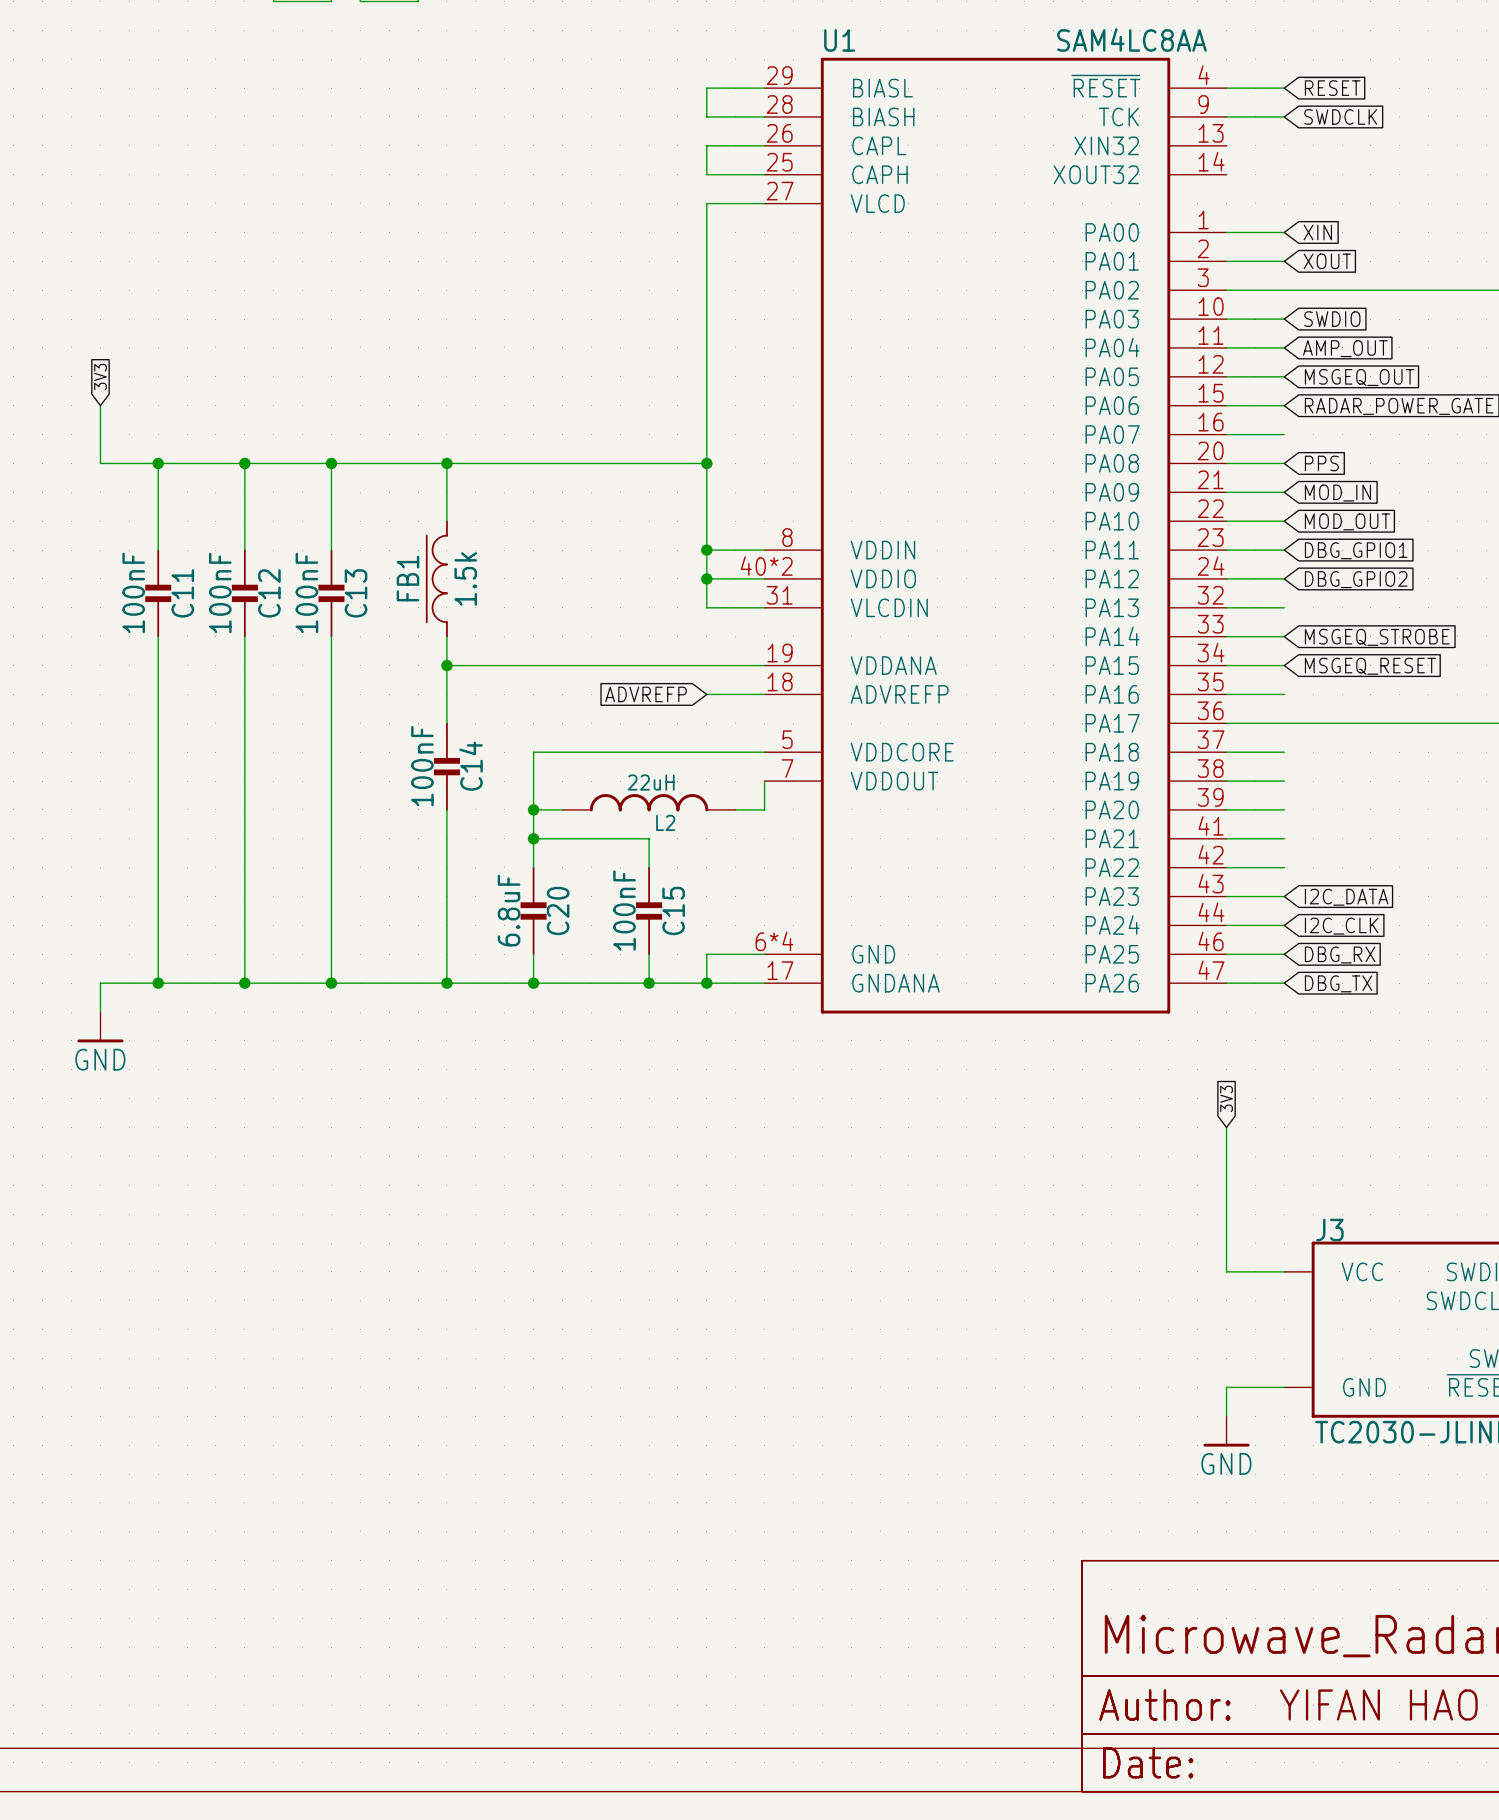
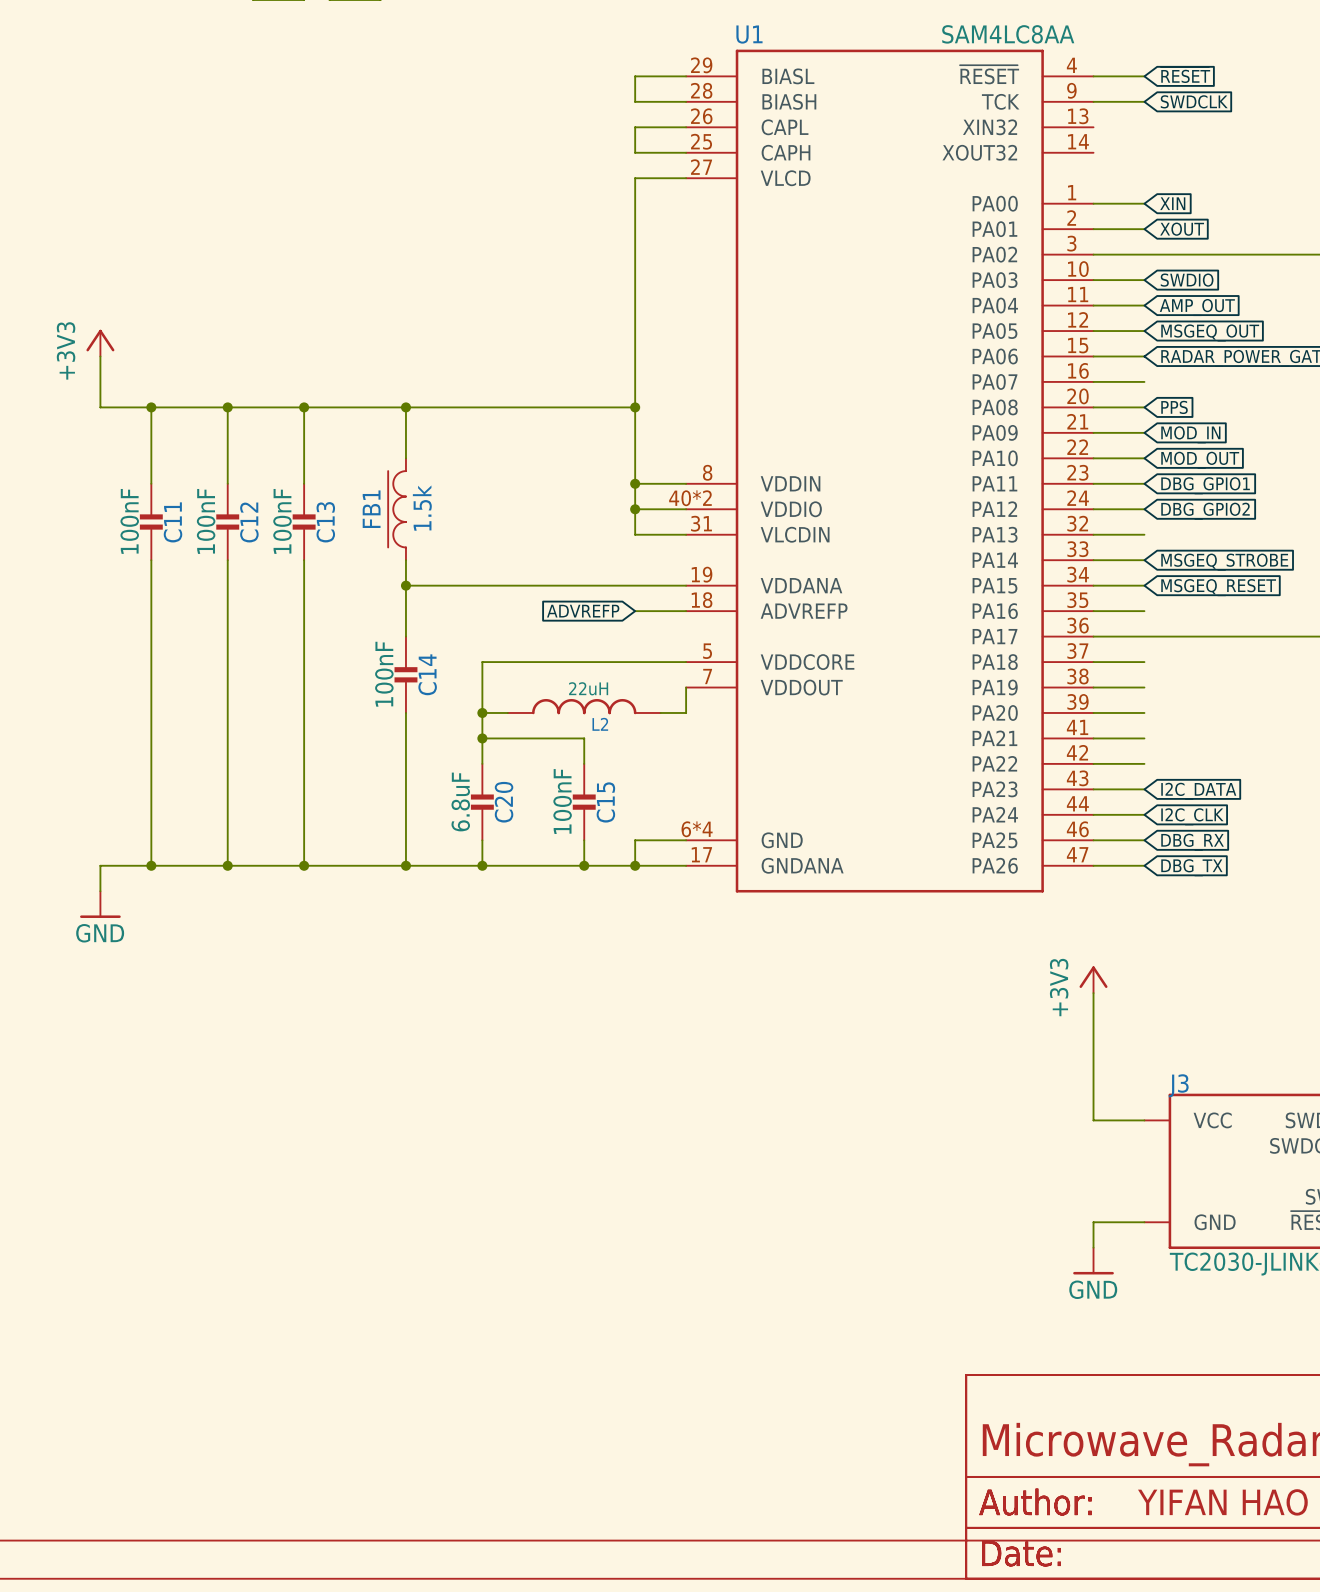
global label: 3V3 (100, 377) -> none
power symbol: none -> +3V3 (100, 343)
global label: 3V3 (1226, 1098) -> none
power symbol: none -> +3V3 (1093, 979)

